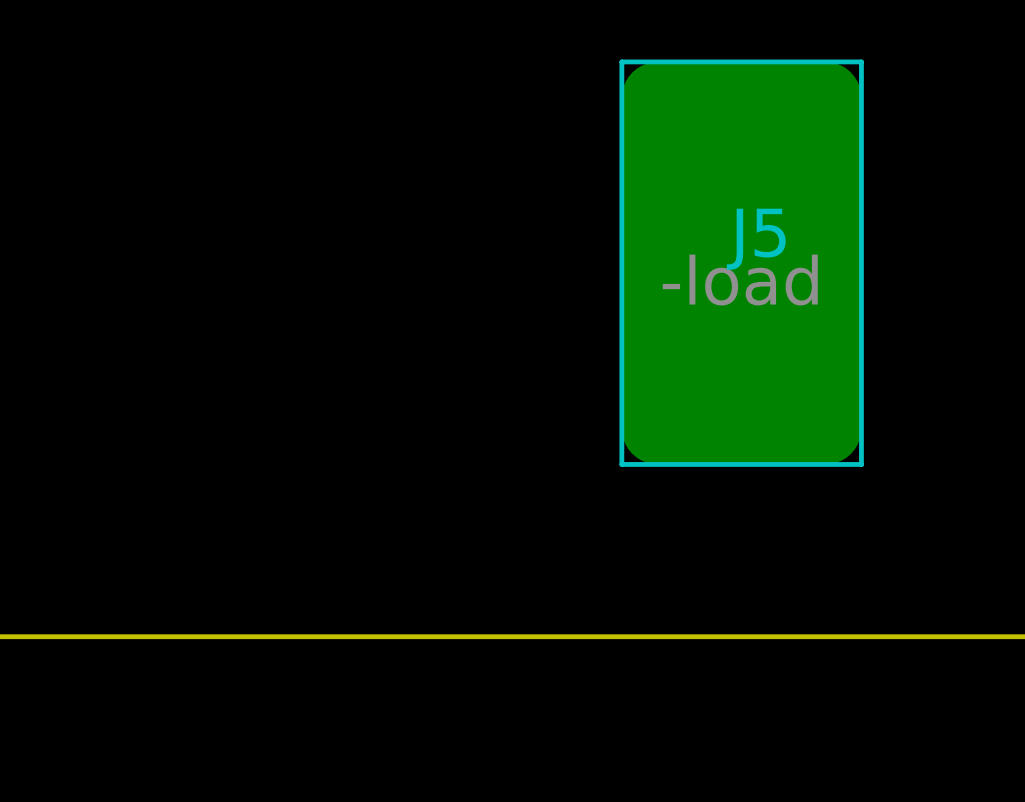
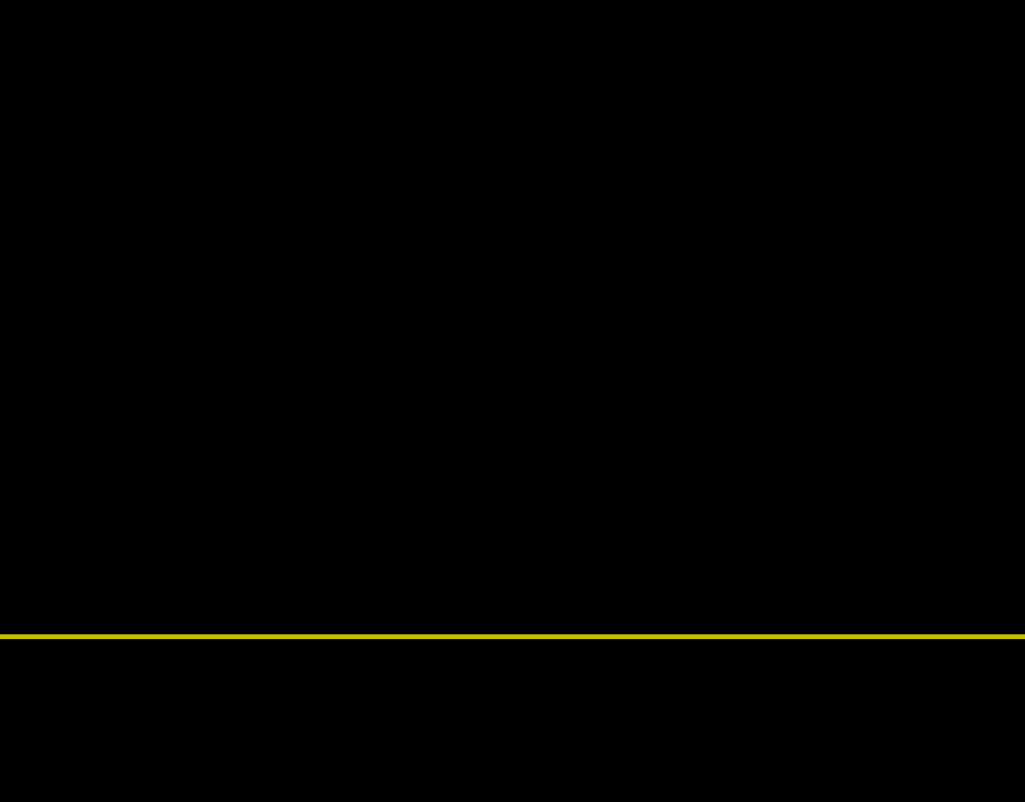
J5: -load (741, 263) -> none

